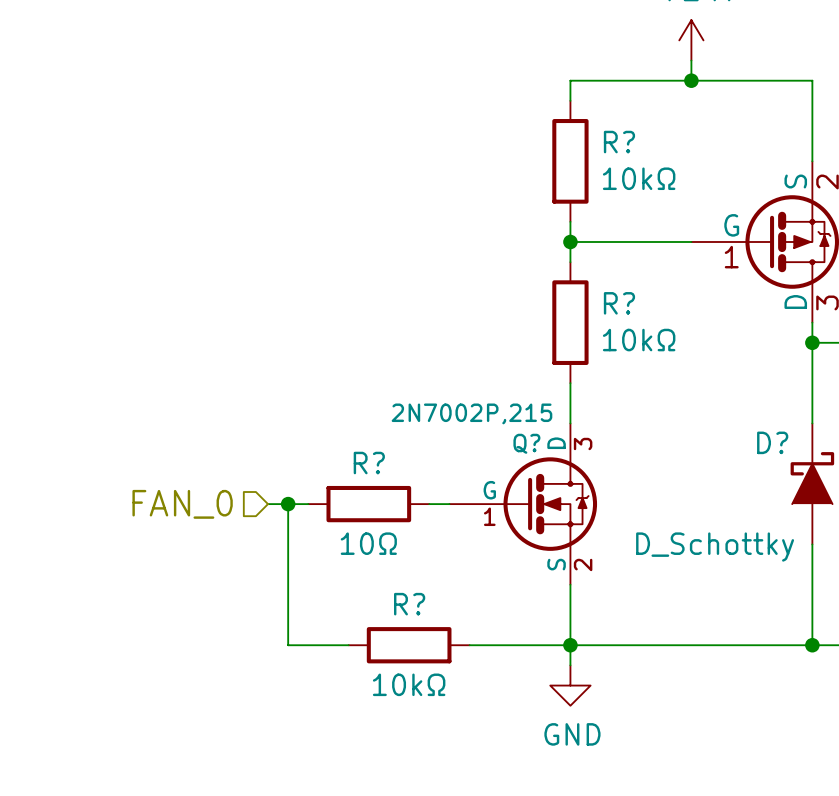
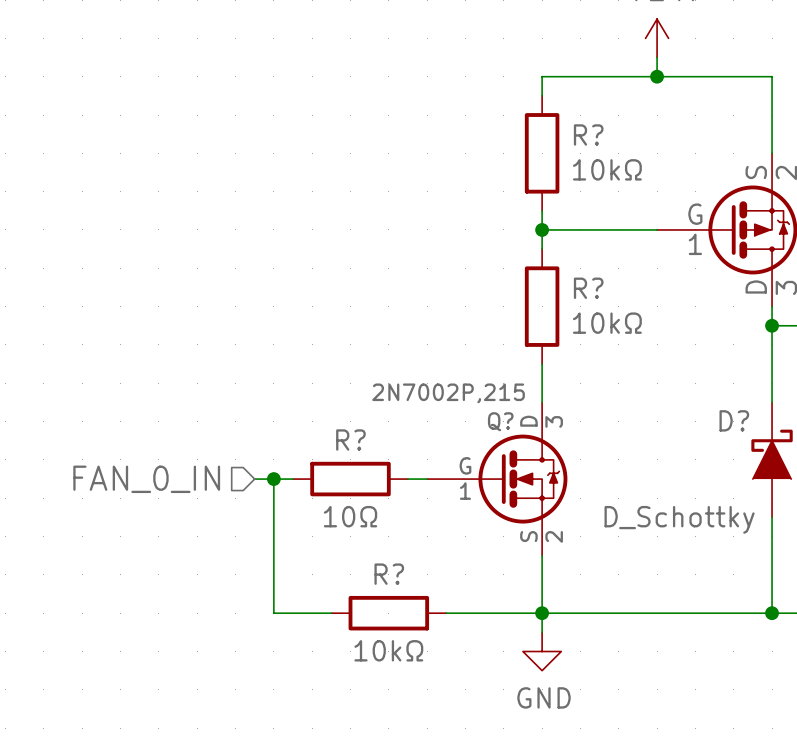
hierarchical label: FAN_0 (182, 504) -> FAN_0_IN (146, 479)

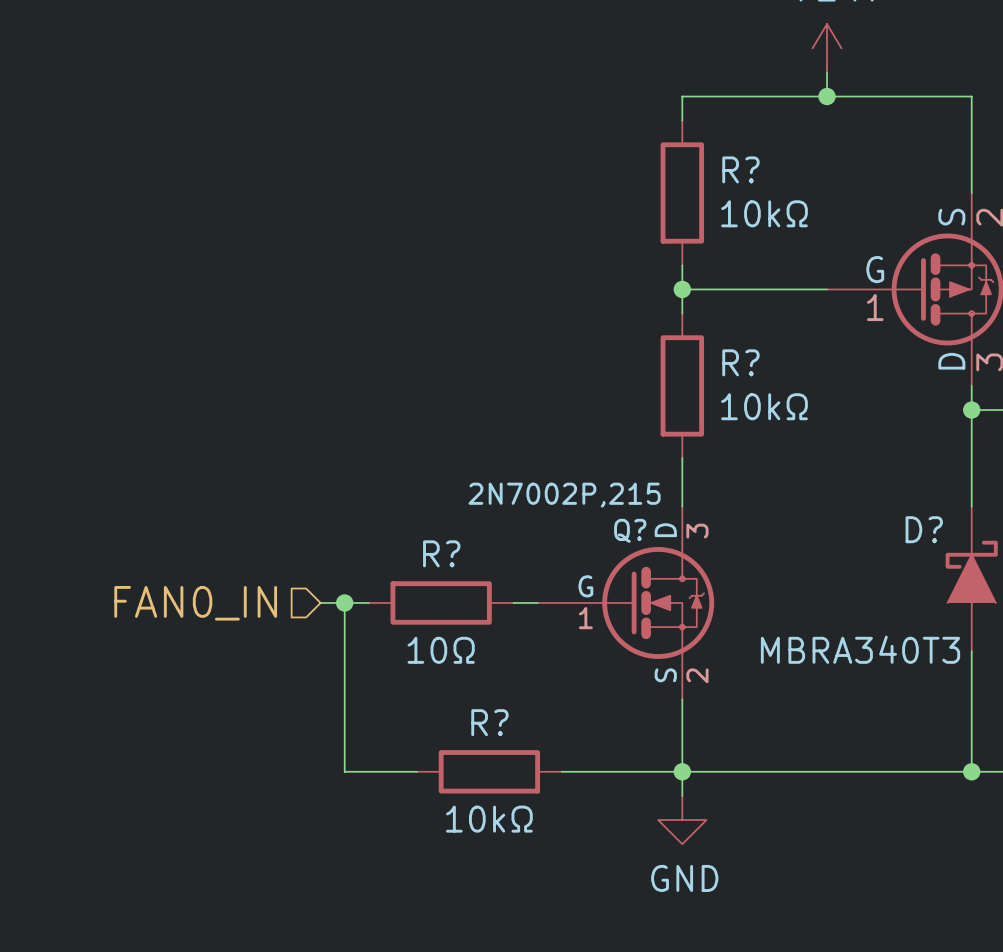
hierarchical label: FAN_0_IN (146, 479) -> FAN0_IN (195, 603)
D? value: D_Schottky (679, 519) -> MBRA340T3 (860, 649)

